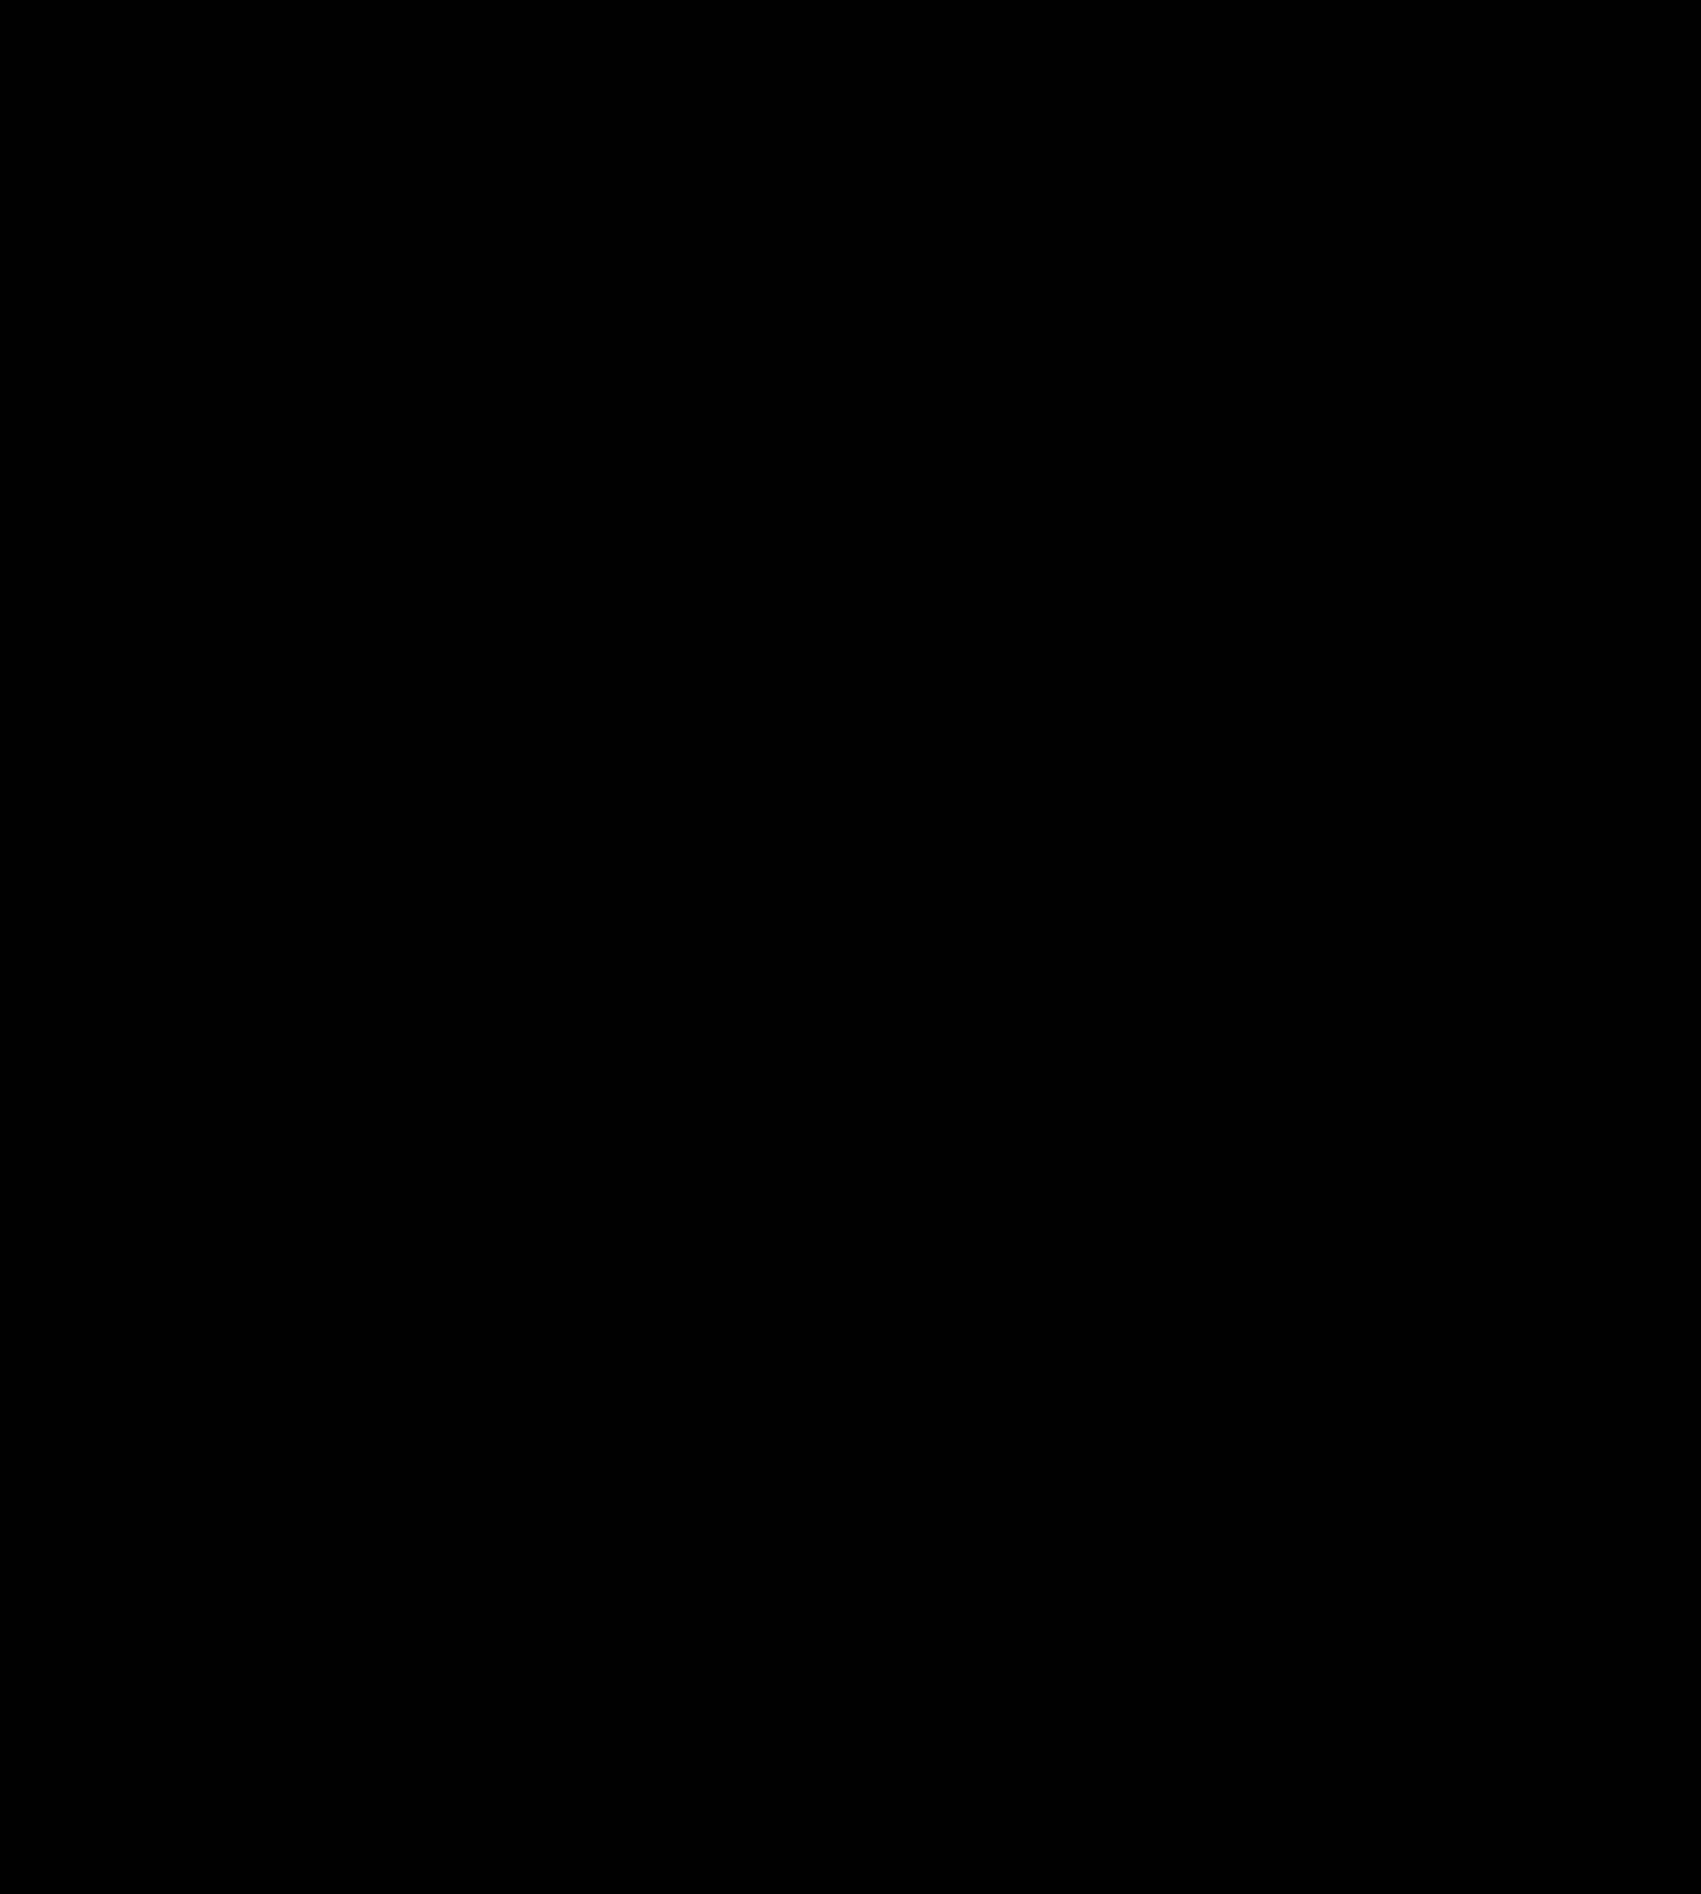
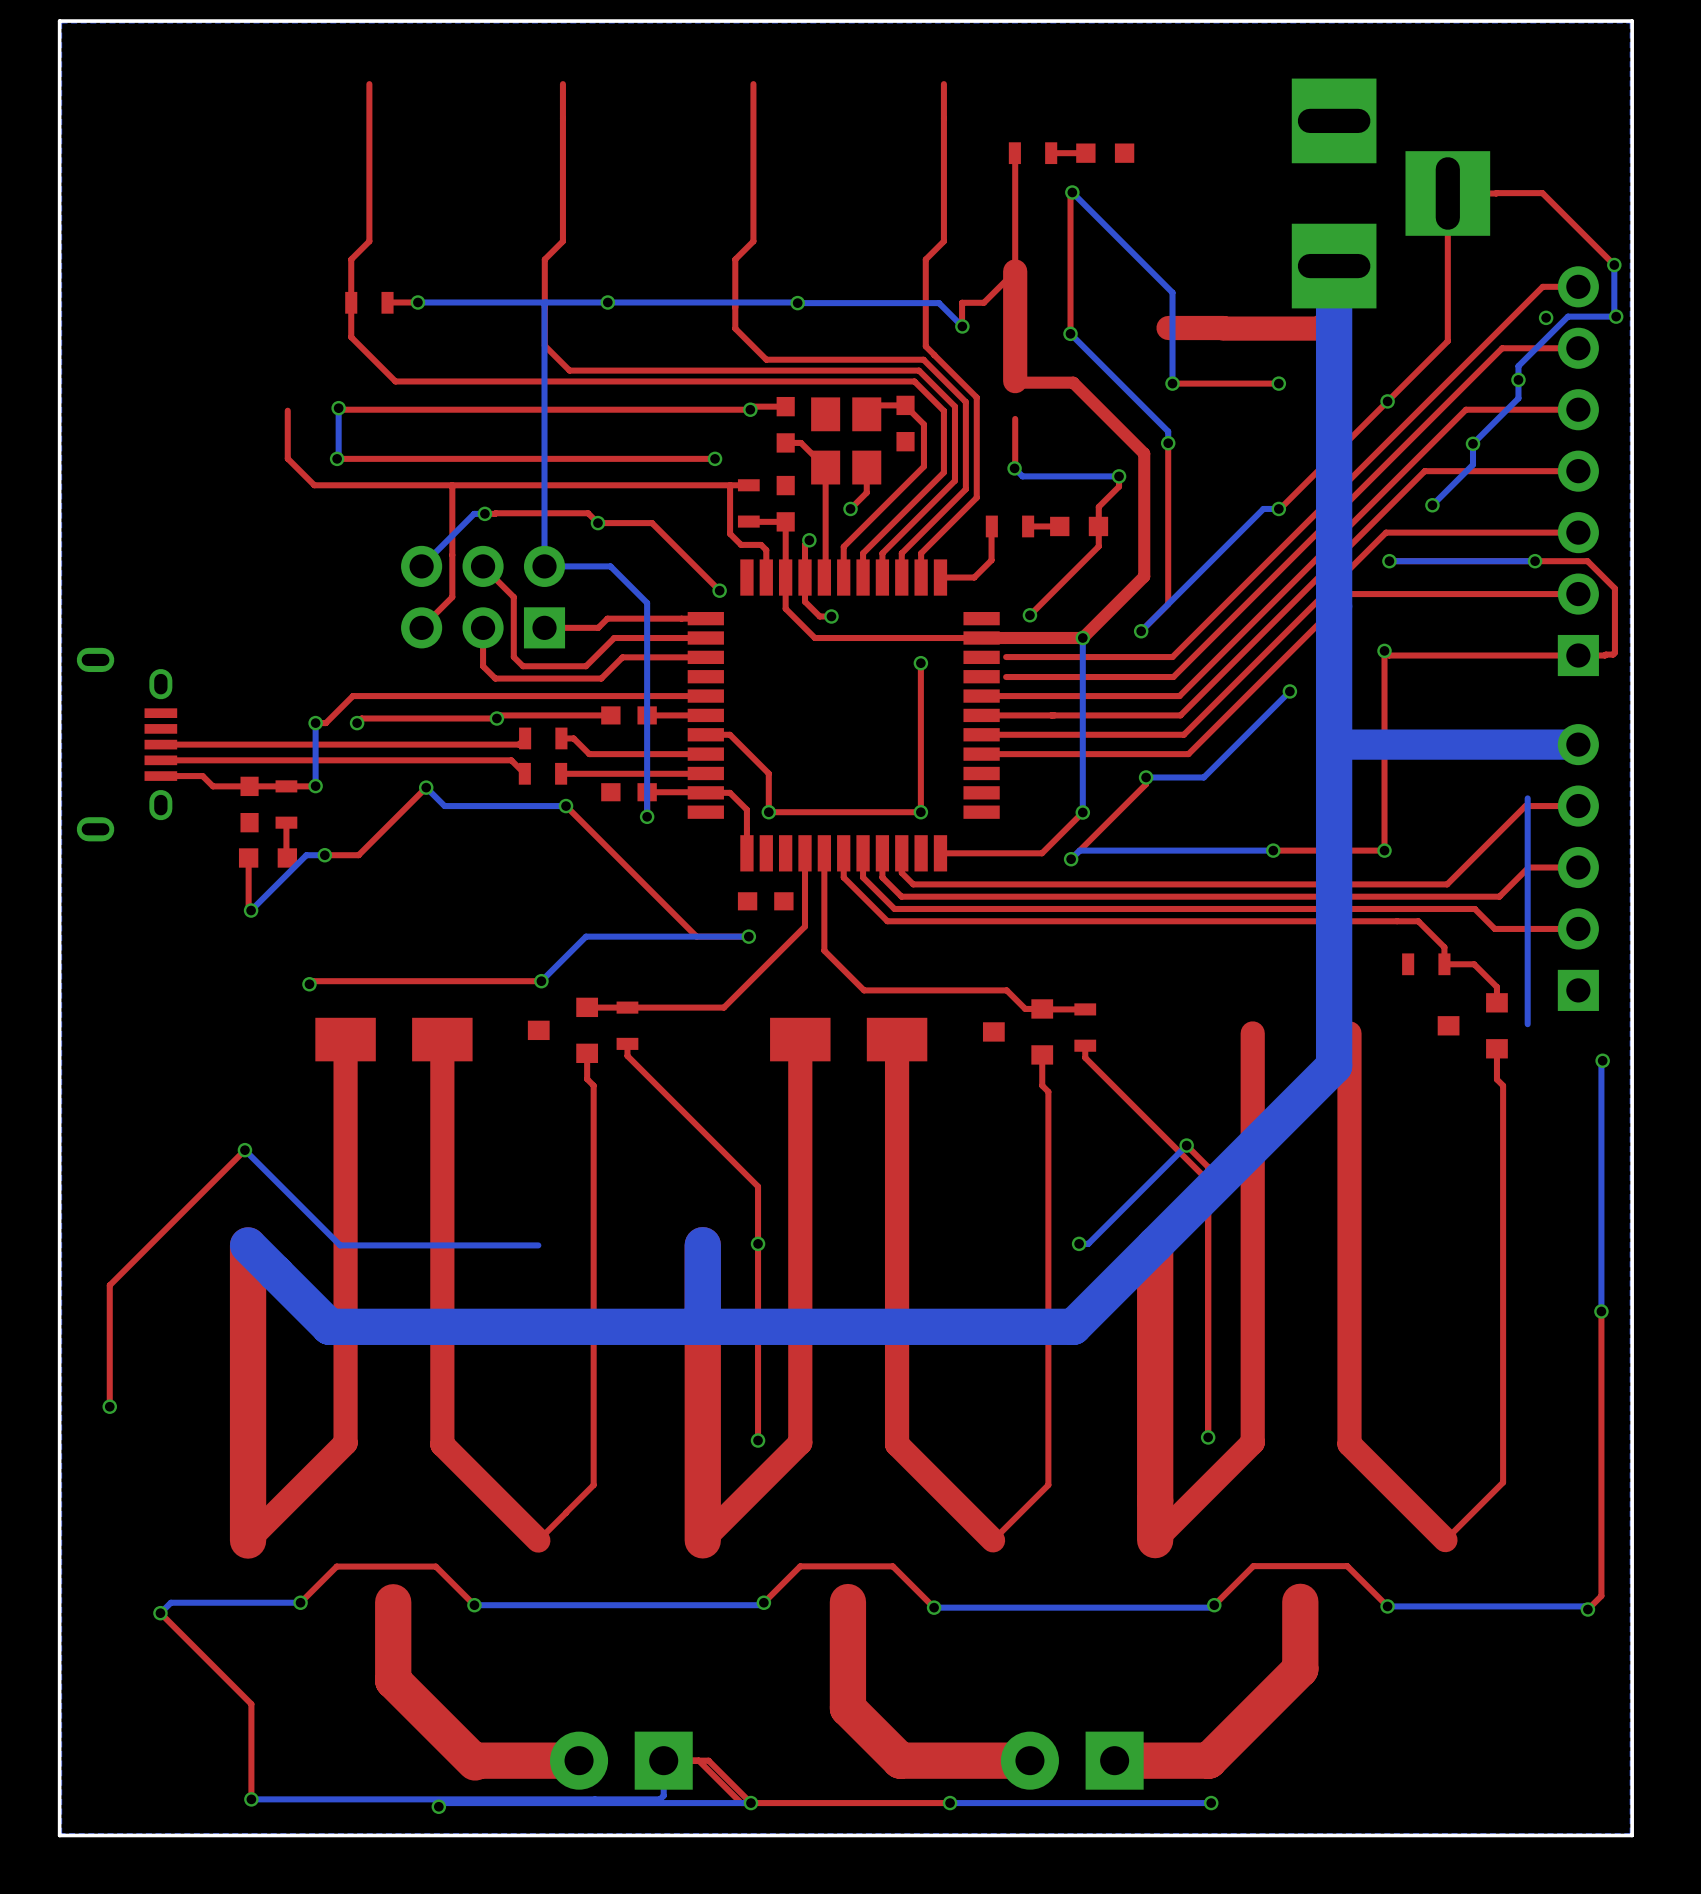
board edge: none -> (1632, 21) (59, 21) (59, 1835) (1632, 1835) (1632, 21)
bottom zone outline: none -> (1630, 22) (61, 22) (61, 1833) (1630, 1833) (1630, 22)
top track: none -> (369, 84) (369, 241) (351, 259) (351, 337) (395, 381) (914, 381) (943, 410) (943, 472) (863, 553) (863, 577)
top track: none -> (562, 84) (562, 241) (544, 259) (544, 345) (569, 370) (919, 370) (954, 406) (954, 480) (882, 553) (882, 577)
top track: none -> (753, 84) (753, 241) (735, 259) (735, 328) (766, 359) (923, 359) (965, 402) (965, 489) (901, 553) (901, 577)
top track: none -> (943, 84) (943, 241) (925, 259) (925, 346) (976, 397) (976, 497) (921, 553) (921, 577)
top track: none -> (1015, 153) (1015, 271)
part: none -> (1033, 153)
top track: none -> (1085, 153) (1051, 153)
part: none -> (1105, 153)
bottom track: none -> (1072, 192) (1172, 292) (1172, 383)
top track: none -> (1072, 192) (1070, 194) (1070, 333)
via: none -> (1072, 192)
part: none -> (1390, 193)
bottom track: none -> (1614, 265) (1614, 314) (1616, 316) (1567, 316) (1518, 366) (1518, 398) (1472, 443) (1472, 464) (1432, 505)
top track: none -> (1614, 265) (1542, 193) (1447, 193) (1447, 341) (1278, 508)
via: none -> (1614, 265)
top track: none -> (1333, 266) (1334, 314) (1319, 328) (1223, 328)
bottom track: none -> (1334, 266) (1334, 1066) (1073, 1326) (329, 1326) (248, 1245)
top track: none -> (1015, 271) (983, 302) (962, 302) (962, 326)
top track: none -> (1015, 271) (1014, 382)
top track: none -> (1578, 286) (1542, 286) (1172, 657) (1006, 657)
part: none -> (369, 302)
bottom track: none -> (417, 302) (939, 303) (962, 326)
top track: none -> (417, 302) (387, 302)
via: none -> (417, 302)
bottom track: none -> (545, 302) (544, 566) (610, 566) (647, 602) (647, 816)
via: none -> (607, 302)
via: none -> (797, 303)
via: none -> (1616, 316)
via: none -> (1546, 317)
via: none -> (962, 326)
top track: none -> (1167, 327) (1223, 328)
bottom track: none -> (1070, 333) (1168, 431) (1168, 443)
via: none -> (1070, 333)
top track: none -> (1578, 348) (1502, 348) (1173, 677) (1006, 677)
via: none -> (1518, 379)
top track: none -> (1015, 382) (1073, 382) (1144, 453) (1144, 576) (1082, 638) (814, 638) (785, 608) (785, 521) (749, 521)
via: none -> (1172, 383)
top track: none -> (1278, 383) (1172, 383)
via: none -> (1278, 383)
via: none -> (1387, 401)
top track: none -> (785, 406) (753, 406) (750, 409) (340, 409) (338, 408)
bottom track: none -> (338, 408) (337, 458)
via: none -> (338, 408)
via: none -> (750, 409)
top track: none -> (1578, 409) (1465, 409) (1179, 696) (981, 696)
top track: none -> (287, 410) (287, 458) (314, 485) (748, 485)
top track: none -> (866, 414) (875, 405) (905, 405) (923, 424) (923, 466) (843, 546) (843, 577)
top track: none -> (1015, 418) (1014, 468)
part: none -> (905, 423)
part: none -> (785, 424)
part: none -> (846, 440)
top track: none -> (785, 442) (801, 442) (825, 467) (824, 577)
top track: none -> (1168, 443) (1168, 604) (1141, 631)
via: none -> (1168, 443)
via: none -> (1472, 443)
via: none -> (337, 458)
top track: none -> (715, 458) (337, 458)
via: none -> (715, 458)
top track: none -> (866, 467) (866, 492) (850, 508)
bottom track: none -> (1014, 468) (1022, 476) (1119, 476)
via: none -> (1014, 468)
top track: none -> (1578, 471) (1424, 471) (1180, 715) (981, 715)
part: none -> (1578, 471)
top track: none -> (1119, 476) (1119, 486) (1098, 506) (1098, 546) (1029, 615)
via: none -> (1119, 476)
top track: none -> (452, 485) (452, 597) (421, 627)
top track: none -> (730, 485) (730, 533) (741, 544) (761, 544) (766, 550) (766, 577)
part: none -> (748, 503)
part: none -> (785, 503)
via: none -> (1432, 505)
via: none -> (850, 508)
bottom track: none -> (1278, 508) (1263, 508) (1141, 631)
via: none -> (1278, 508)
bottom track: none -> (484, 513) (474, 513) (421, 566)
top track: none -> (484, 513) (588, 513) (597, 523) (652, 523) (719, 590)
via: none -> (484, 513)
via: none -> (597, 523)
part: none -> (1009, 526)
top track: none -> (1059, 526) (1028, 526)
part: none -> (1079, 526)
top track: none -> (991, 531) (991, 560) (974, 577) (941, 576)
top track: none -> (1578, 532) (1386, 532) (1183, 734) (981, 734)
top track: none -> (809, 540) (805, 544) (805, 601) (819, 616) (831, 616)
via: none -> (809, 540)
top track: none -> (1389, 561) (1587, 561) (1614, 588) (1614, 652) (1604, 655) (1389, 655) (1384, 650) (1384, 850) (1273, 850)
via: none -> (1389, 561)
bottom track: none -> (1535, 561) (1389, 561)
via: none -> (1535, 561)
top track: none -> (483, 566) (513, 597) (513, 657) (523, 666) (585, 666) (614, 638) (705, 638)
via: none -> (719, 590)
top track: none -> (1578, 594) (1348, 594) (1188, 754) (981, 754)
part: none -> (483, 597)
via: none -> (1029, 615)
via: none -> (831, 616)
top track: none -> (705, 618) (607, 618) (598, 627) (544, 627)
top track: none -> (483, 627) (483, 666) (495, 678) (601, 678) (622, 657) (705, 657)
via: none -> (1141, 631)
bottom track: none -> (1082, 638) (1082, 812)
via: none -> (1082, 638)
via: none -> (1384, 650)
top track: none -> (920, 663) (920, 812) (768, 812) (768, 773) (730, 734) (705, 734)
via: none -> (920, 663)
bottom track: none -> (1289, 691) (1203, 777) (1146, 777)
via: none -> (1289, 691)
top track: none -> (705, 696) (352, 696) (325, 723) (315, 723)
top track: none -> (610, 715) (499, 715) (496, 718) (361, 718) (357, 723)
part: none -> (629, 715)
top track: none -> (705, 715) (647, 715)
part: none -> (843, 715)
via: none -> (496, 718)
bottom track: none -> (315, 723) (315, 786)
via: none -> (315, 723)
via: none -> (357, 723)
top track: none -> (525, 738) (518, 744) (160, 744)
part: none -> (543, 738)
top track: none -> (561, 738) (573, 738) (589, 754) (705, 754)
bottom track: none -> (1334, 740) (1338, 744) (1578, 744)
part: none -> (126, 744)
top track: none -> (160, 760) (511, 760) (524, 773)
part: none -> (542, 773)
top track: none -> (705, 773) (561, 773)
top track: none -> (160, 776) (202, 776) (212, 786) (315, 786)
top track: none -> (1146, 777) (1146, 784) (1071, 859)
via: none -> (1146, 777)
via: none -> (315, 786)
bottom track: none -> (426, 787) (444, 806) (566, 806)
top track: none -> (426, 787) (358, 855) (324, 855)
via: none -> (426, 787)
part: none -> (629, 792)
bottom track: none -> (1527, 798) (1527, 1024)
part: none -> (249, 804)
part: none -> (286, 804)
top track: none -> (566, 806) (696, 936) (748, 936)
via: none -> (566, 806)
top track: none -> (1578, 806) (1525, 806) (1447, 884) (913, 884) (901, 872) (901, 853)
via: none -> (768, 812)
via: none -> (920, 812)
top track: none -> (1082, 812) (1041, 853) (940, 853)
via: none -> (1082, 812)
top track: none -> (647, 816) (647, 792) (730, 792) (746, 809) (746, 853)
via: none -> (647, 816)
top track: none -> (286, 822) (287, 857)
bottom track: none -> (1273, 850) (1079, 850) (1071, 859)
via: none -> (1273, 850)
via: none -> (1384, 850)
top track: none -> (805, 853) (805, 926) (723, 1007) (587, 1007)
top track: none -> (824, 853) (824, 950) (864, 990) (1006, 990) (1025, 1008) (1042, 1008)
top track: none -> (843, 853) (843, 877) (887, 921) (1418, 921) (1444, 947) (1444, 964) (1474, 964) (1496, 987) (1496, 1002)
top track: none -> (863, 853) (863, 877) (894, 908) (1474, 908) (1494, 928) (1578, 928)
top track: none -> (882, 853) (882, 877) (901, 896) (1499, 896) (1528, 867) (1578, 867)
bottom track: none -> (324, 855) (306, 855) (251, 910)
via: none -> (324, 855)
top track: none -> (248, 857) (248, 908) (251, 910)
part: none -> (267, 857)
via: none -> (1071, 859)
part: none -> (1578, 867)
part: none -> (765, 901)
via: none -> (251, 910)
bottom track: none -> (748, 936) (585, 936) (541, 981)
via: none -> (748, 936)
part: none -> (1426, 964)
top track: none -> (541, 981) (312, 981) (309, 984)
via: none -> (541, 981)
via: none -> (309, 984)
top track: none -> (1041, 1008) (1085, 1009)
part: none -> (627, 1025)
part: none -> (1472, 1025)
part: none -> (1085, 1027)
part: none -> (562, 1030)
top track: none -> (800, 1030) (800, 1442) (702, 1540) (702, 1245)
top track: none -> (897, 1030) (897, 1444) (993, 1540) (1048, 1485) (1048, 1091) (1042, 1085) (1042, 1054)
part: none -> (1018, 1031)
top track: none -> (1252, 1033) (1252, 1442) (1155, 1540) (1155, 1244)
top track: none -> (1349, 1033) (1349, 1444) (1445, 1540) (1503, 1482) (1503, 1085) (1496, 1079) (1496, 1048)
top track: none -> (345, 1039) (345, 1443) (248, 1540) (248, 1245)
part: none -> (393, 1039)
top track: none -> (442, 1039) (442, 1444) (538, 1540) (593, 1485) (593, 1085) (587, 1079) (587, 1053)
part: none -> (848, 1039)
top track: none -> (627, 1043) (627, 1055) (758, 1186) (758, 1440)
top track: none -> (1085, 1045) (1085, 1057) (1208, 1180)
bottom track: none -> (1602, 1060) (1601, 1311)
via: none -> (1602, 1060)
bottom track: none -> (1186, 1145) (1088, 1243) (1079, 1243)
top track: none -> (1186, 1145) (1208, 1167) (1208, 1437)
via: none -> (1186, 1145)
bottom track: none -> (244, 1150) (340, 1245) (538, 1245)
top track: none -> (244, 1150) (109, 1285) (109, 1406)
via: none -> (244, 1150)
via: none -> (758, 1243)
via: none -> (1079, 1243)
bottom track: none -> (702, 1245) (702, 1323) (699, 1326)
top track: none -> (1601, 1311) (1601, 1595) (1587, 1609)
via: none -> (1601, 1311)
via: none -> (109, 1406)
via: none -> (1208, 1437)
via: none -> (758, 1440)
top track: none -> (1300, 1601) (1300, 1669) (1208, 1760) (1114, 1760)
bottom track: none -> (300, 1602) (170, 1602) (160, 1613)
top track: none -> (300, 1602) (336, 1566) (435, 1566) (474, 1605)
via: none -> (300, 1602)
top track: none -> (393, 1602) (393, 1680) (475, 1762) (476, 1760) (579, 1760)
bottom track: none -> (763, 1602) (761, 1605) (474, 1605)
top track: none -> (763, 1602) (800, 1566) (892, 1566) (934, 1607)
via: none -> (763, 1602)
top track: none -> (847, 1602) (847, 1708) (900, 1760) (1029, 1760)
via: none -> (474, 1605)
bottom track: none -> (1214, 1605) (1211, 1607) (934, 1607)
top track: none -> (1214, 1605) (1253, 1566) (1347, 1566) (1387, 1606)
via: none -> (1214, 1605)
bottom track: none -> (1387, 1606) (1584, 1606) (1587, 1609)
via: none -> (1387, 1606)
via: none -> (934, 1607)
via: none -> (1587, 1609)
top track: none -> (160, 1613) (251, 1704) (251, 1799)
via: none -> (160, 1613)
part: none -> (621, 1760)
bottom track: none -> (663, 1760) (663, 1795) (660, 1799) (251, 1799)
top track: none -> (663, 1760) (708, 1760) (750, 1803)
top track: none -> (698, 1760) (741, 1803) (950, 1803)
part: none -> (1072, 1760)
via: none -> (251, 1799)
bottom track: none -> (750, 1803) (442, 1803) (438, 1806)
via: none -> (750, 1803)
via: none -> (950, 1803)
bottom track: none -> (1211, 1803) (950, 1803)
via: none -> (1211, 1803)
via: none -> (438, 1806)

